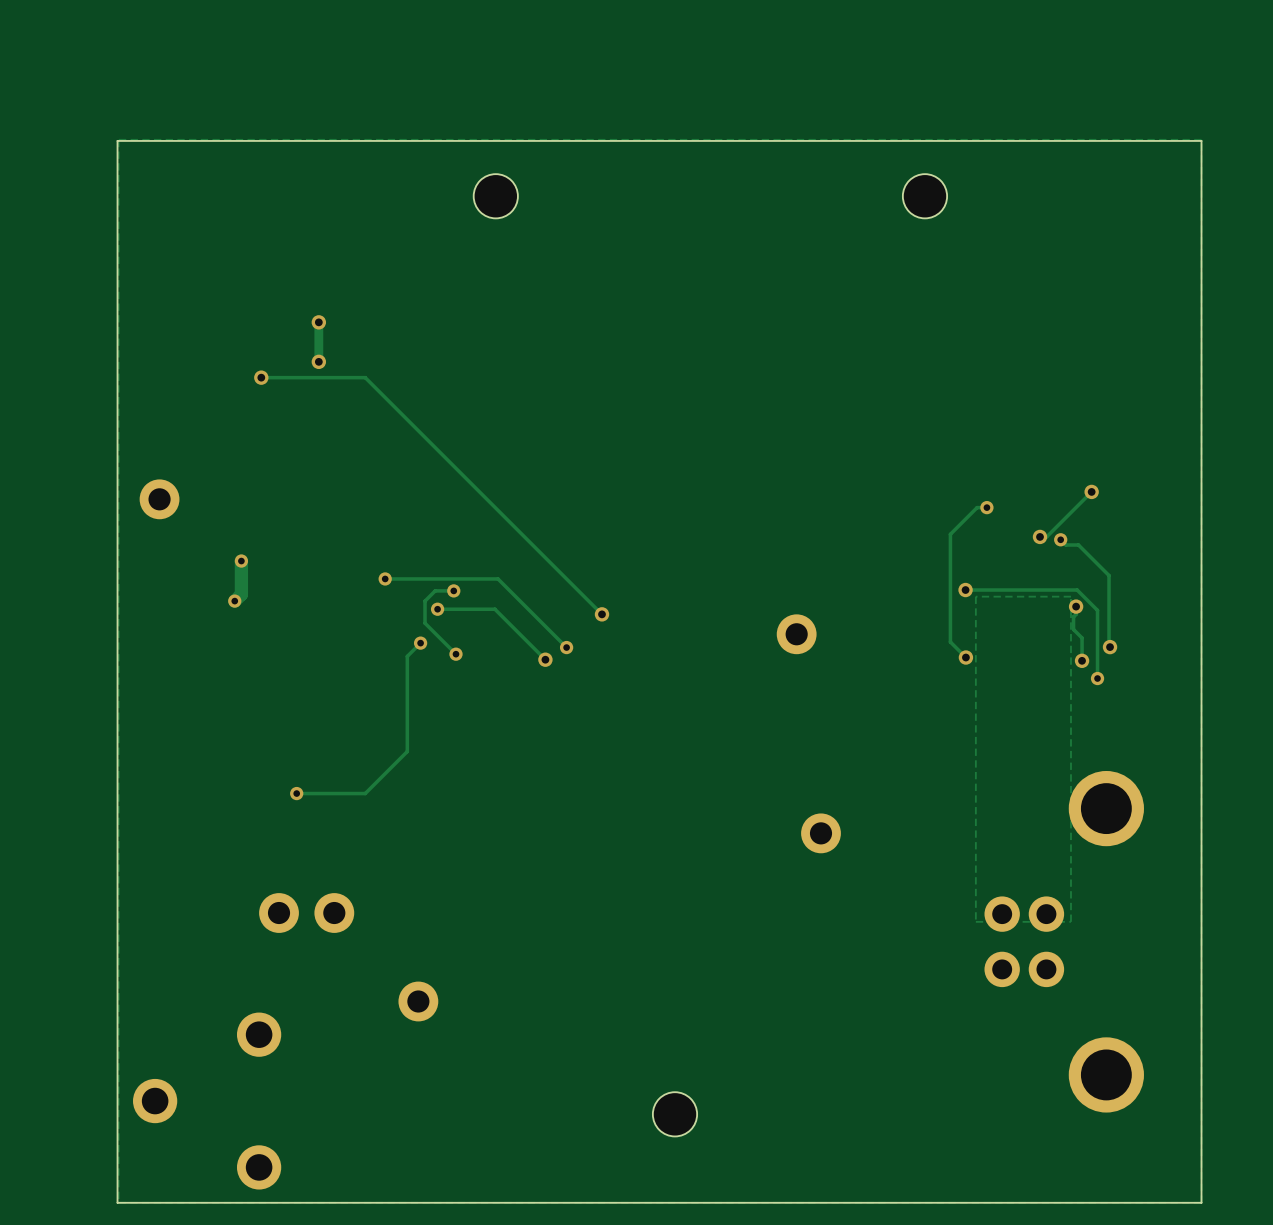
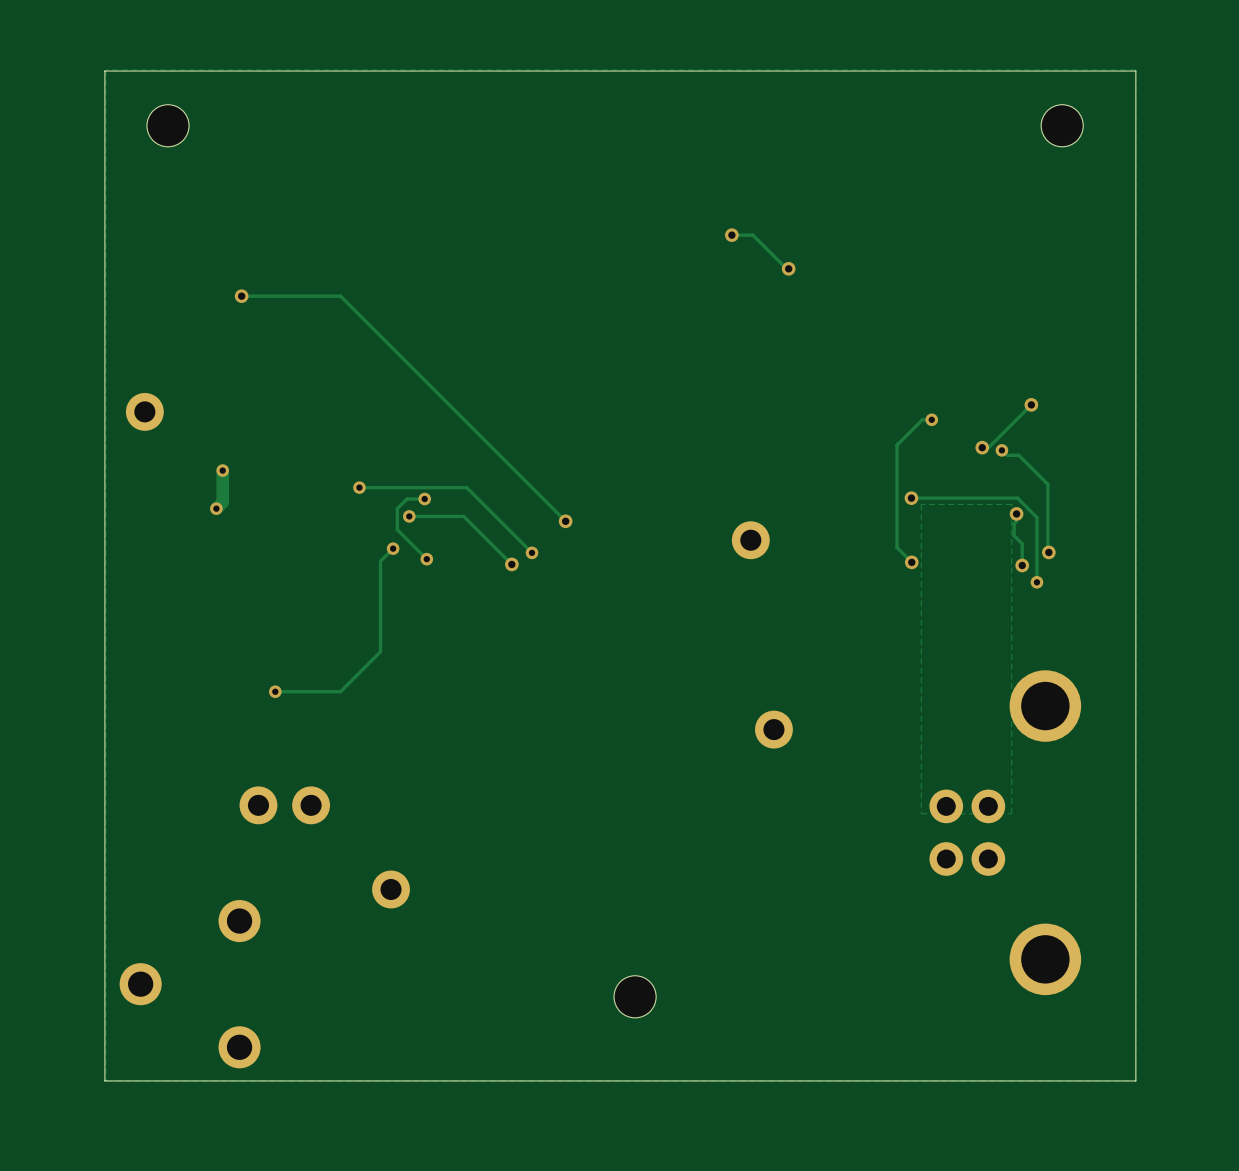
hole position: (495, 196) -> (168, 125)
hole position: (924, 196) -> (1062, 125)
track: none -> (731, 235) (752, 235) (788, 268)
via: none -> (731, 235)
track: (318, 322) (318, 361) -> none
via: (318, 322) -> none
via: none -> (788, 268)
via: (318, 361) -> none

